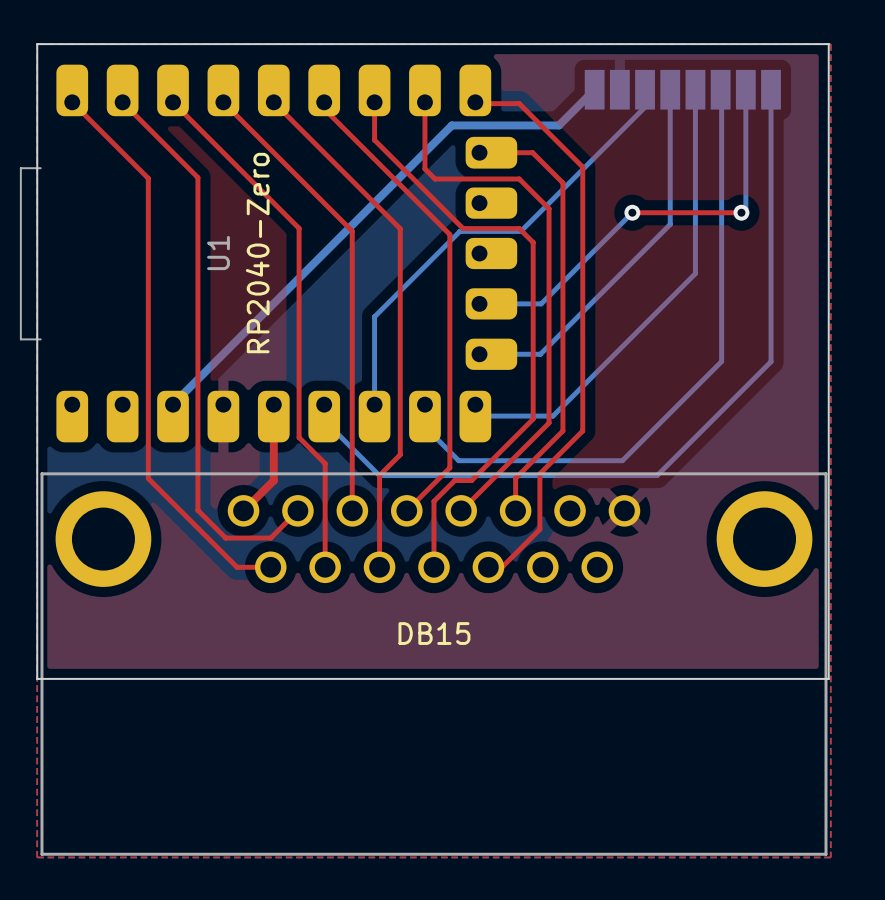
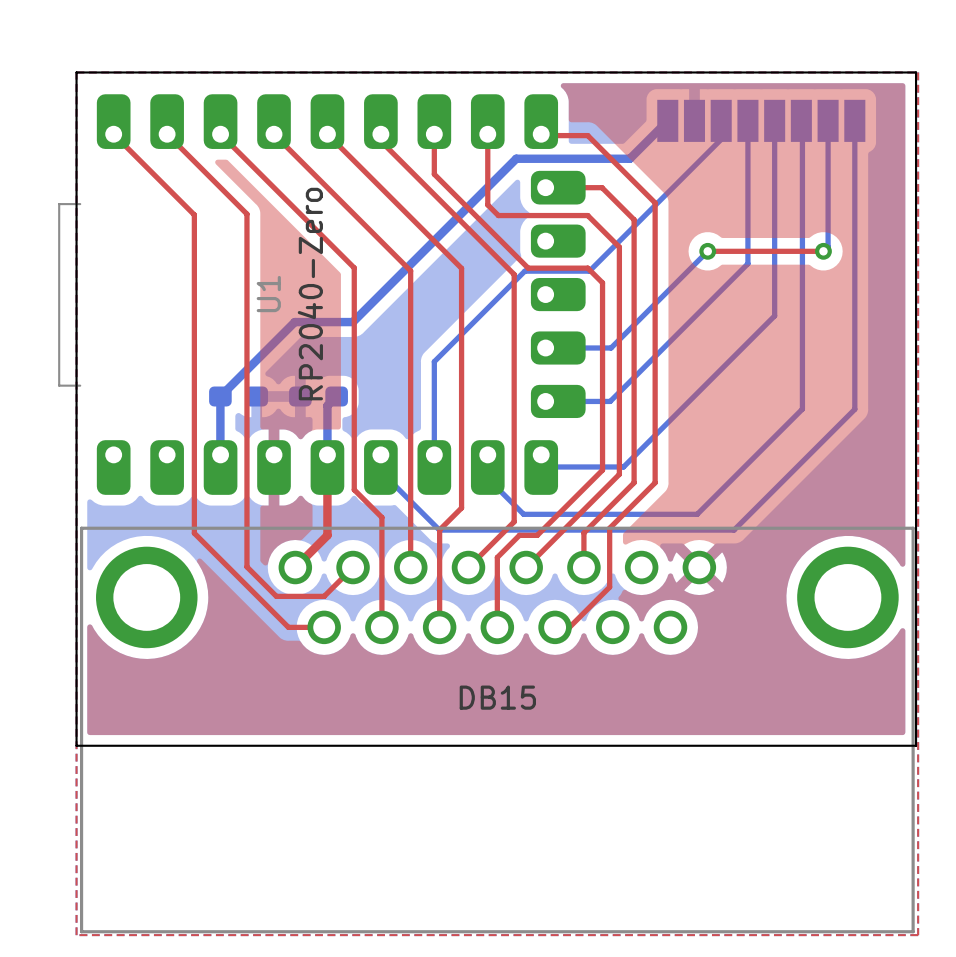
bottom track: (297, 279) (173, 404) -> (352, 322) (294, 322) (220, 396) (220, 454)
part: none -> (238, 396)
part: none -> (318, 396)
bottom track: none -> (336, 396) (327, 405) (327, 454)

